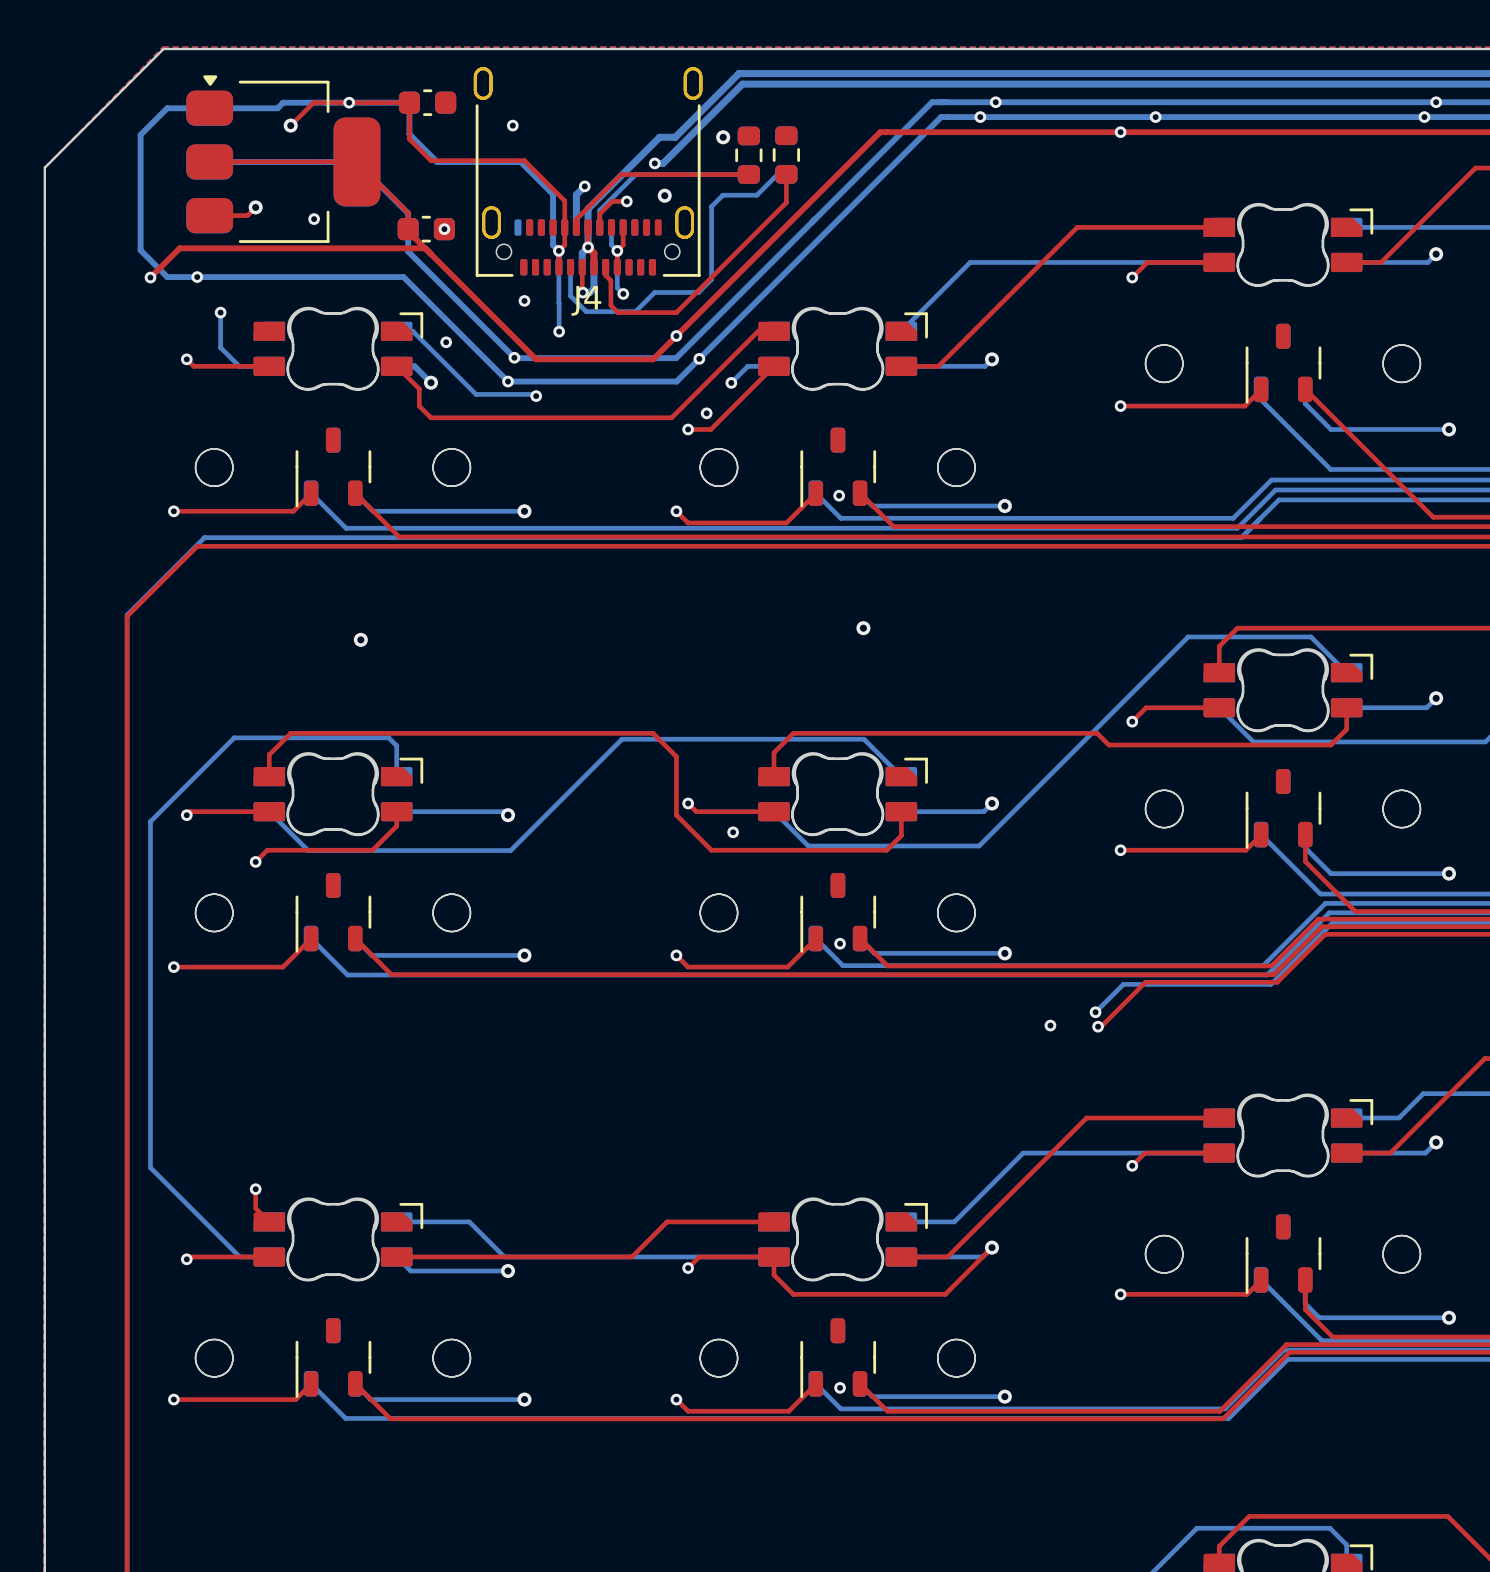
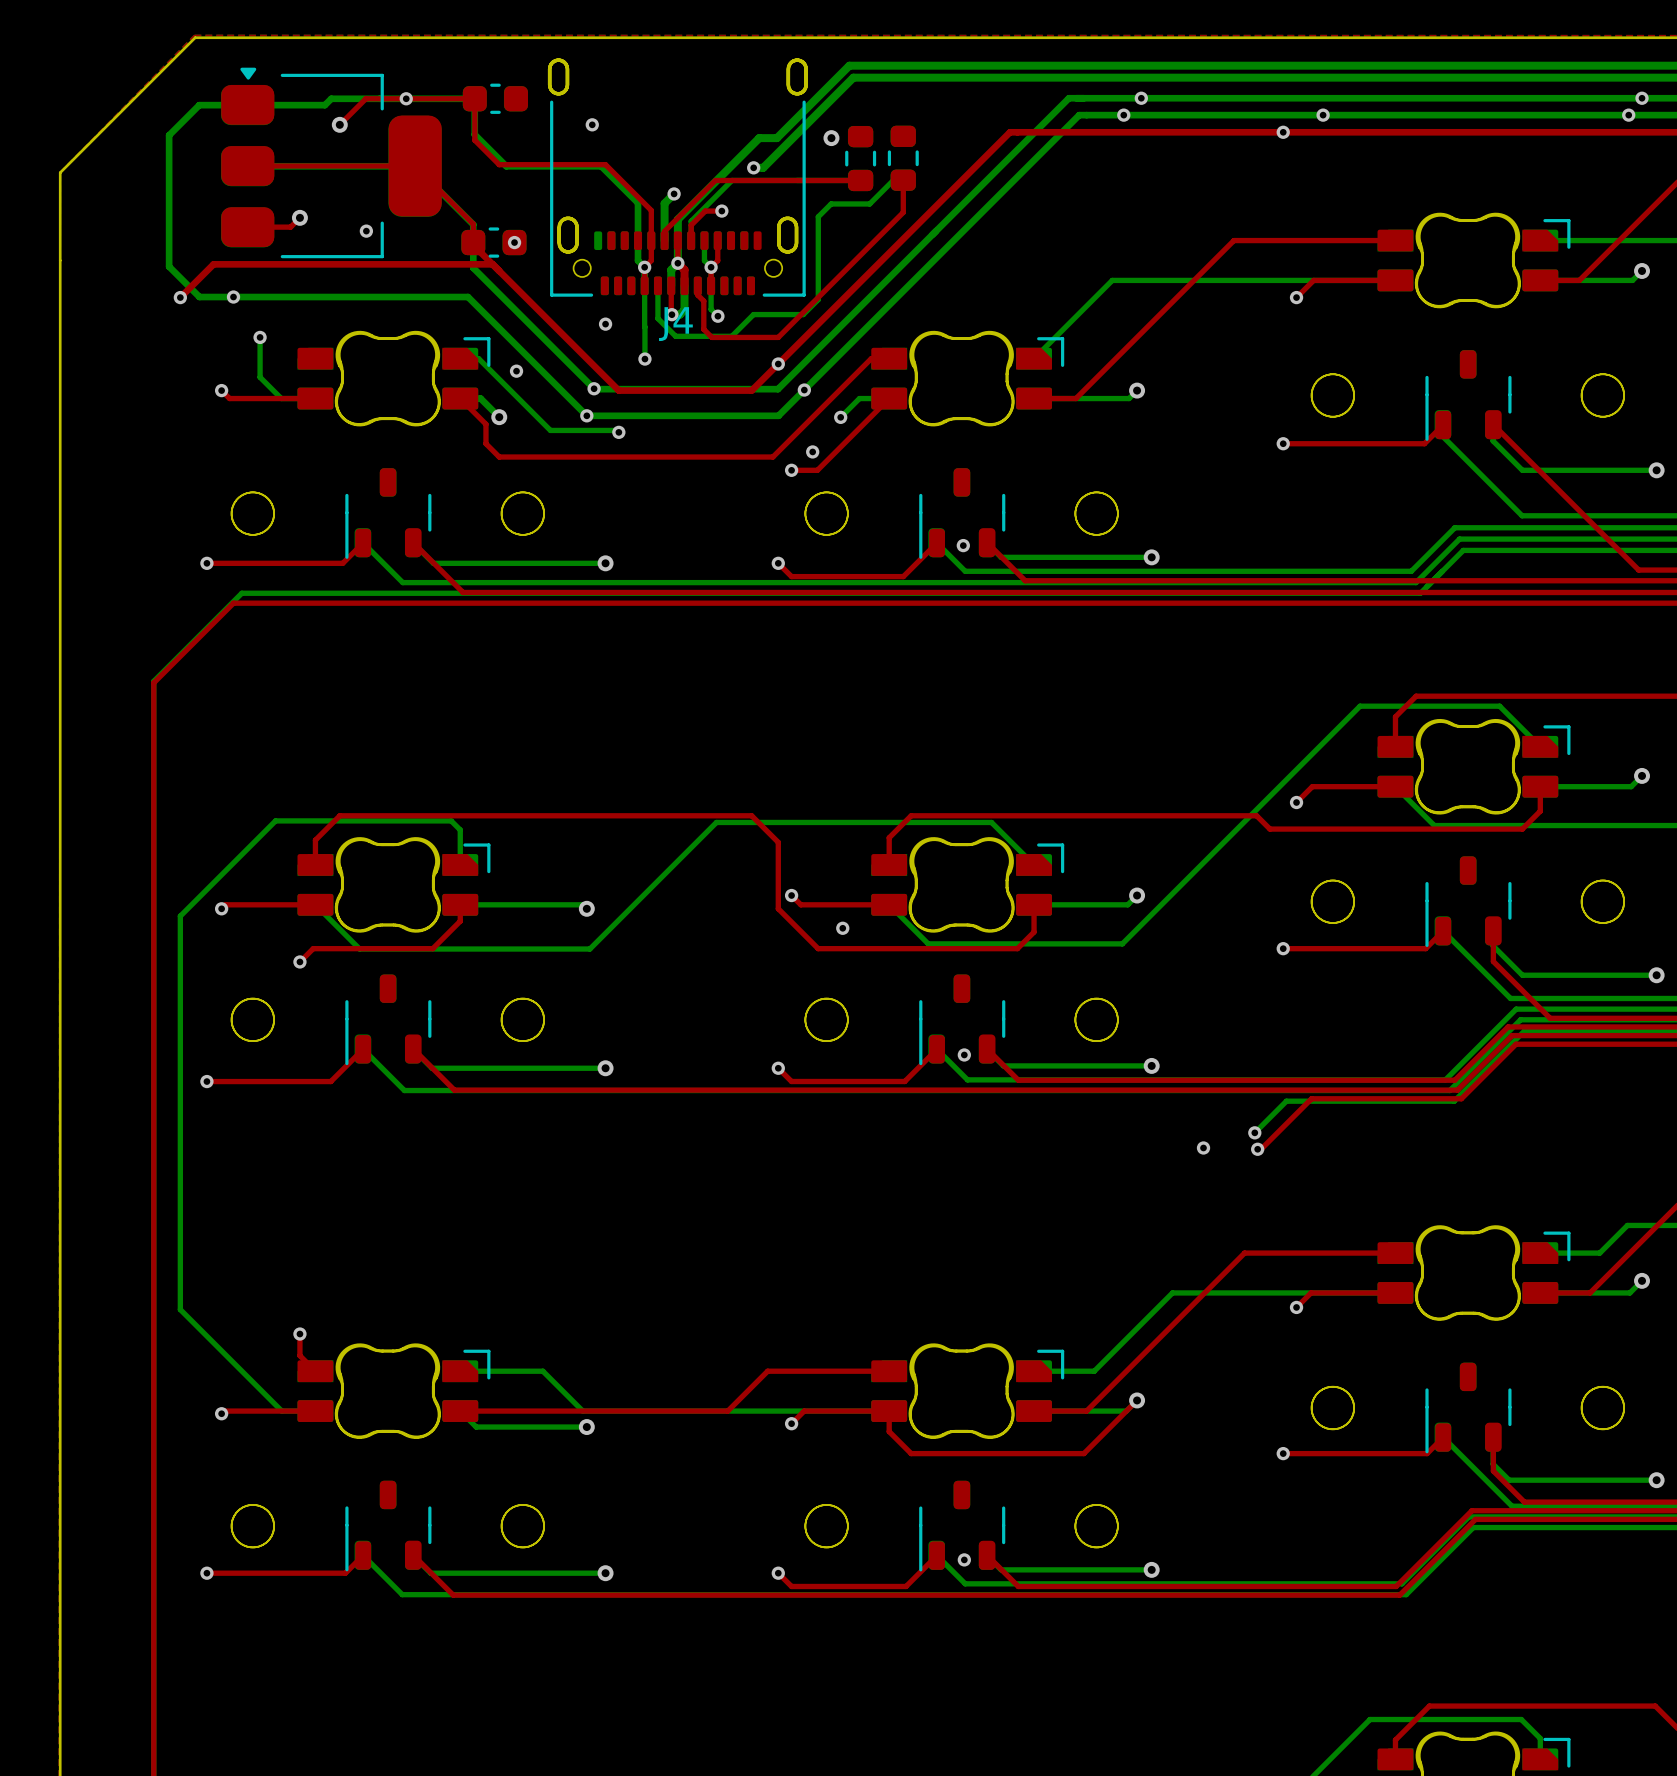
via: (664, 195) -> none
via: (863, 628) -> none
via: (360, 639) -> none

